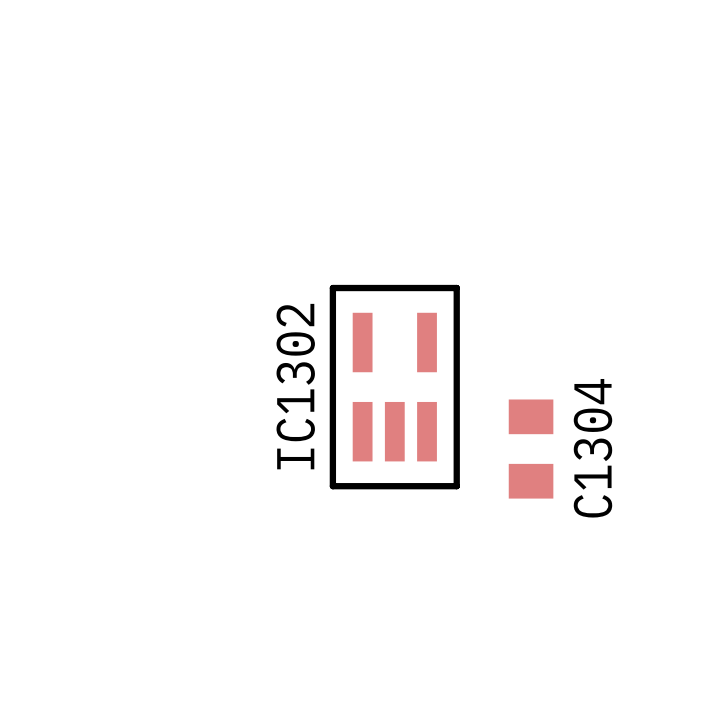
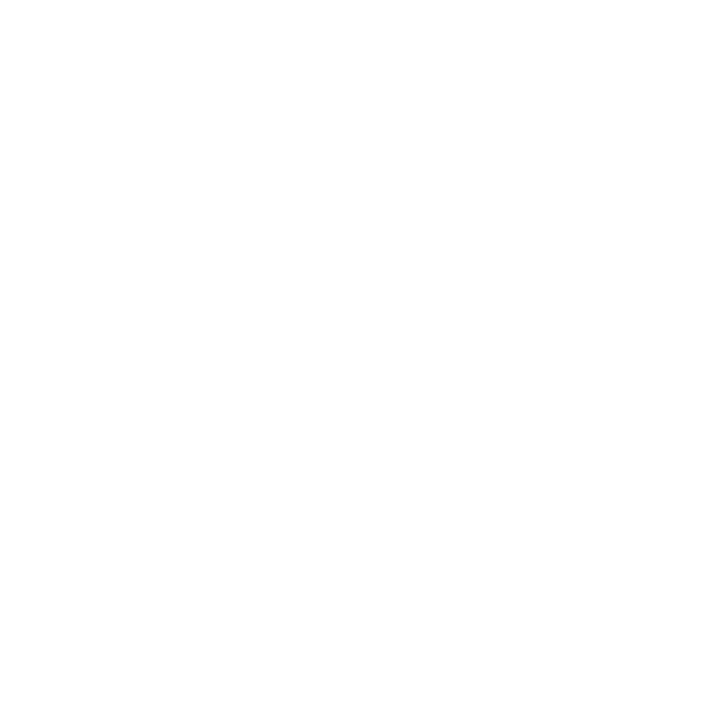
IC1302: (394, 387) -> none
C1304: (531, 449) -> none

